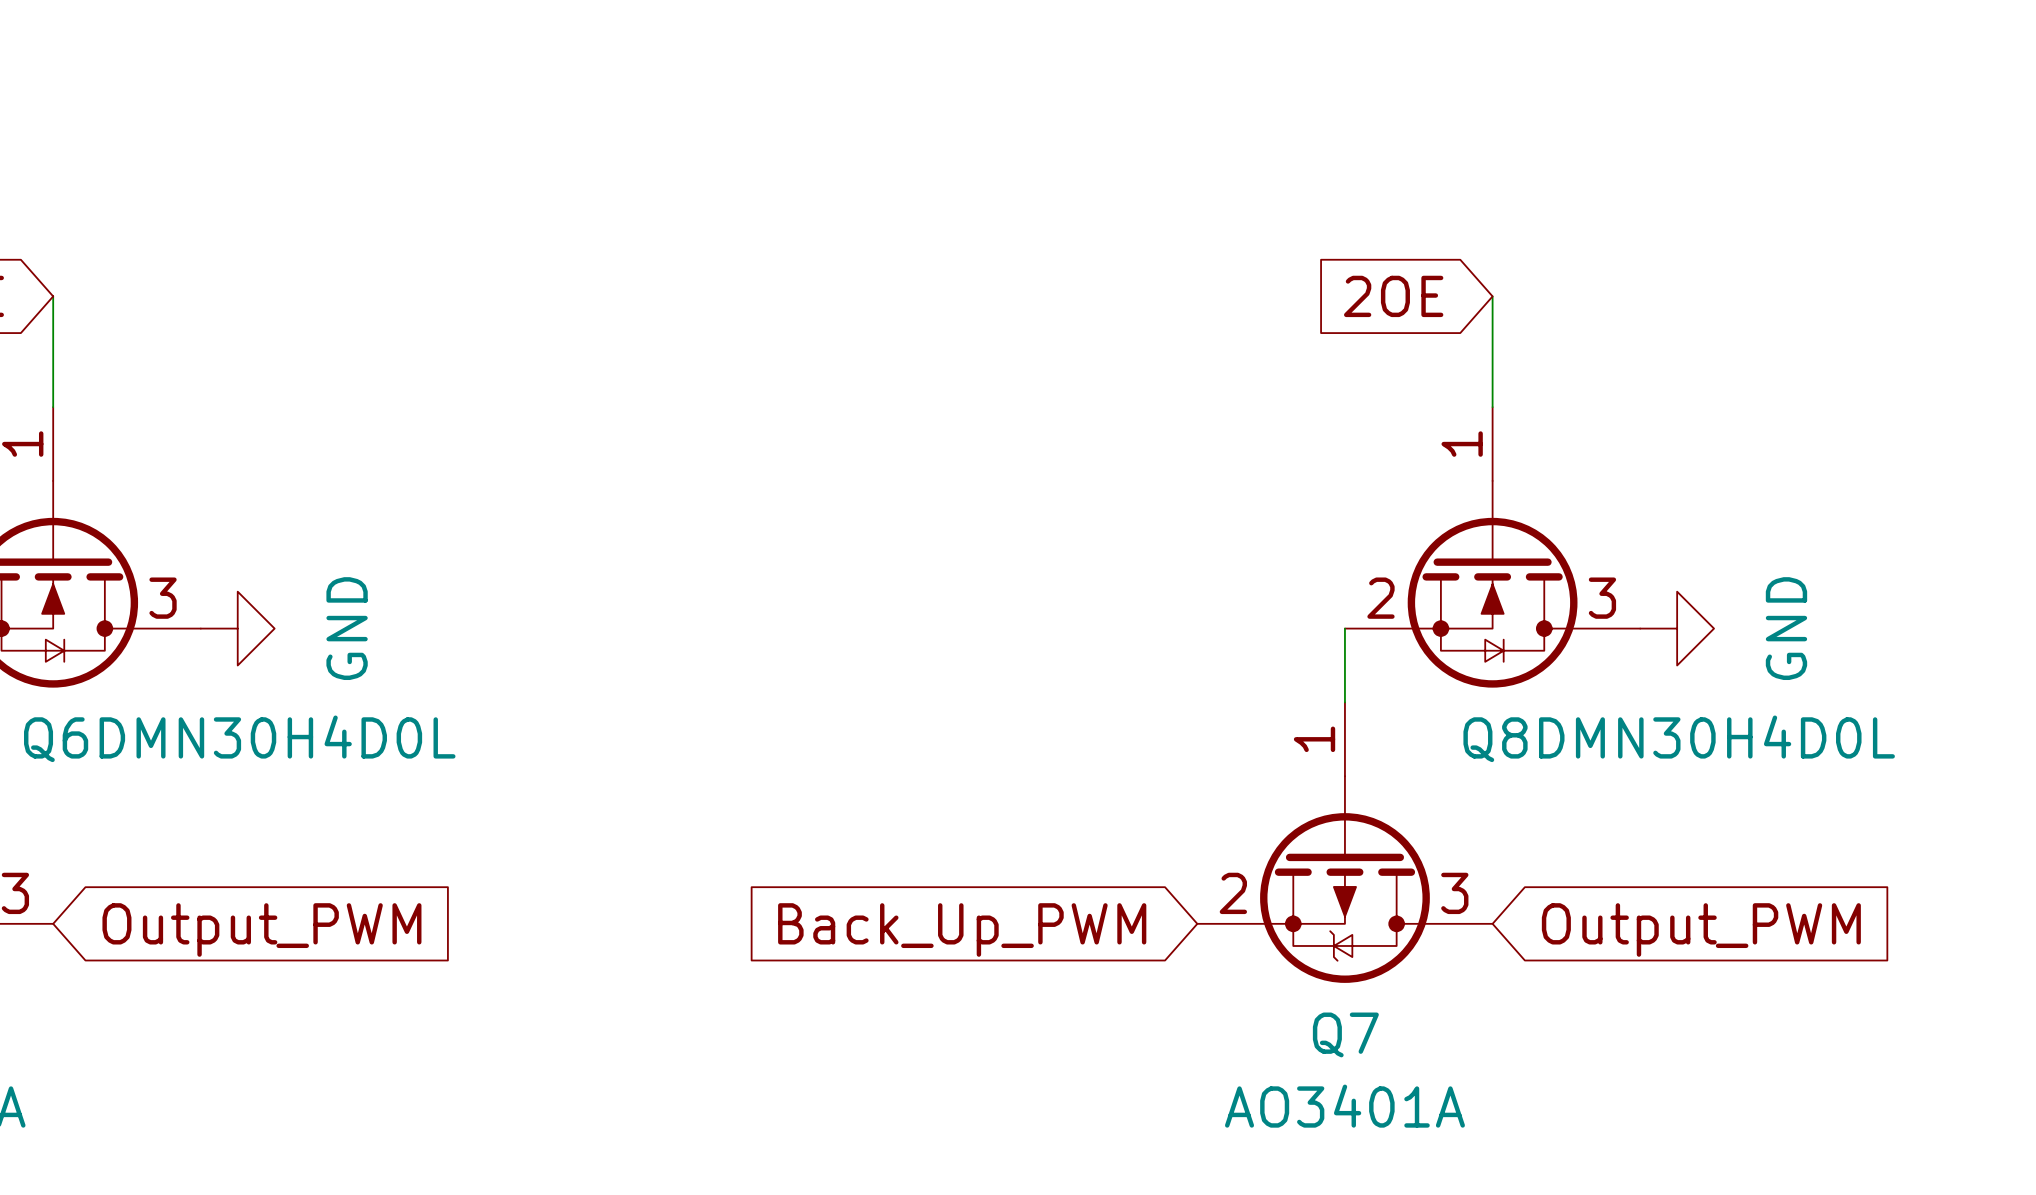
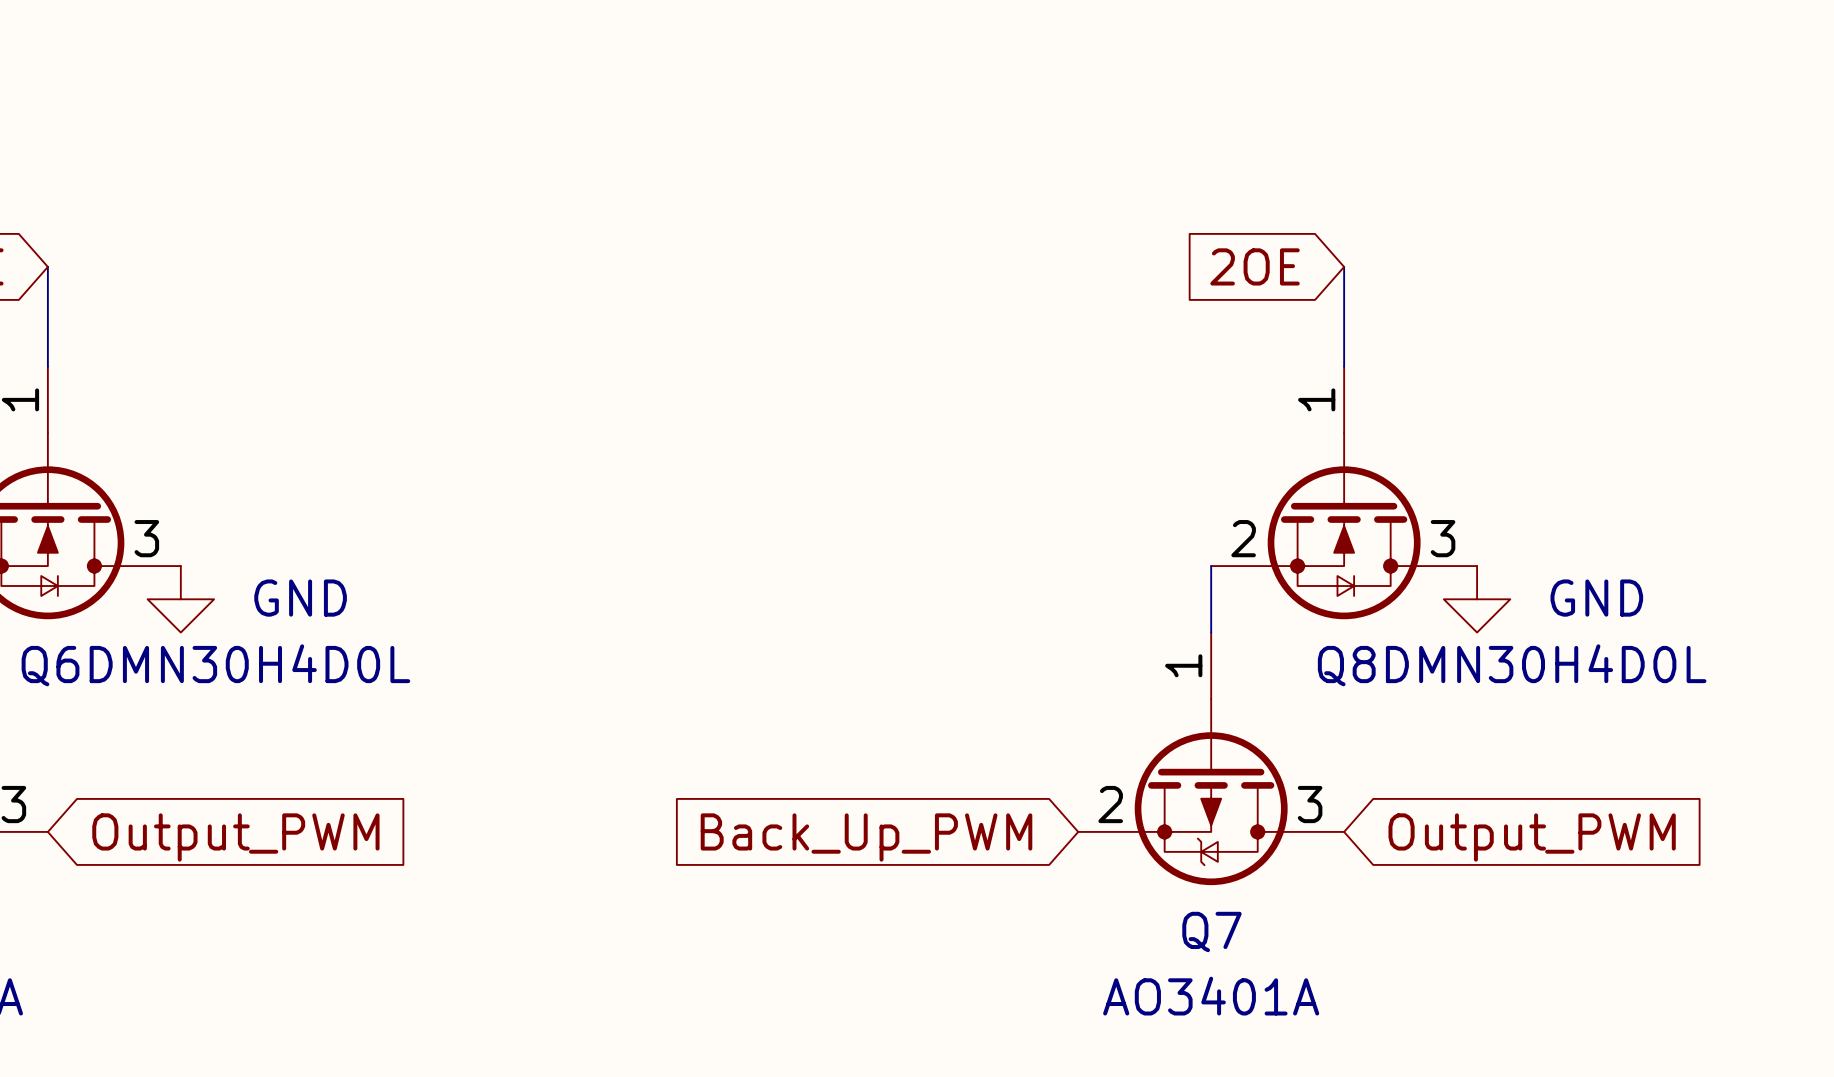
power symbol rotation: 0° (237, 628) -> 90° clockwise (180, 599)
power symbol position: GND (237, 628) -> GND (180, 599)
power symbol rotation: 0° (1677, 628) -> 90° clockwise (1477, 599)
power symbol position: GND (1677, 628) -> GND (1477, 599)

